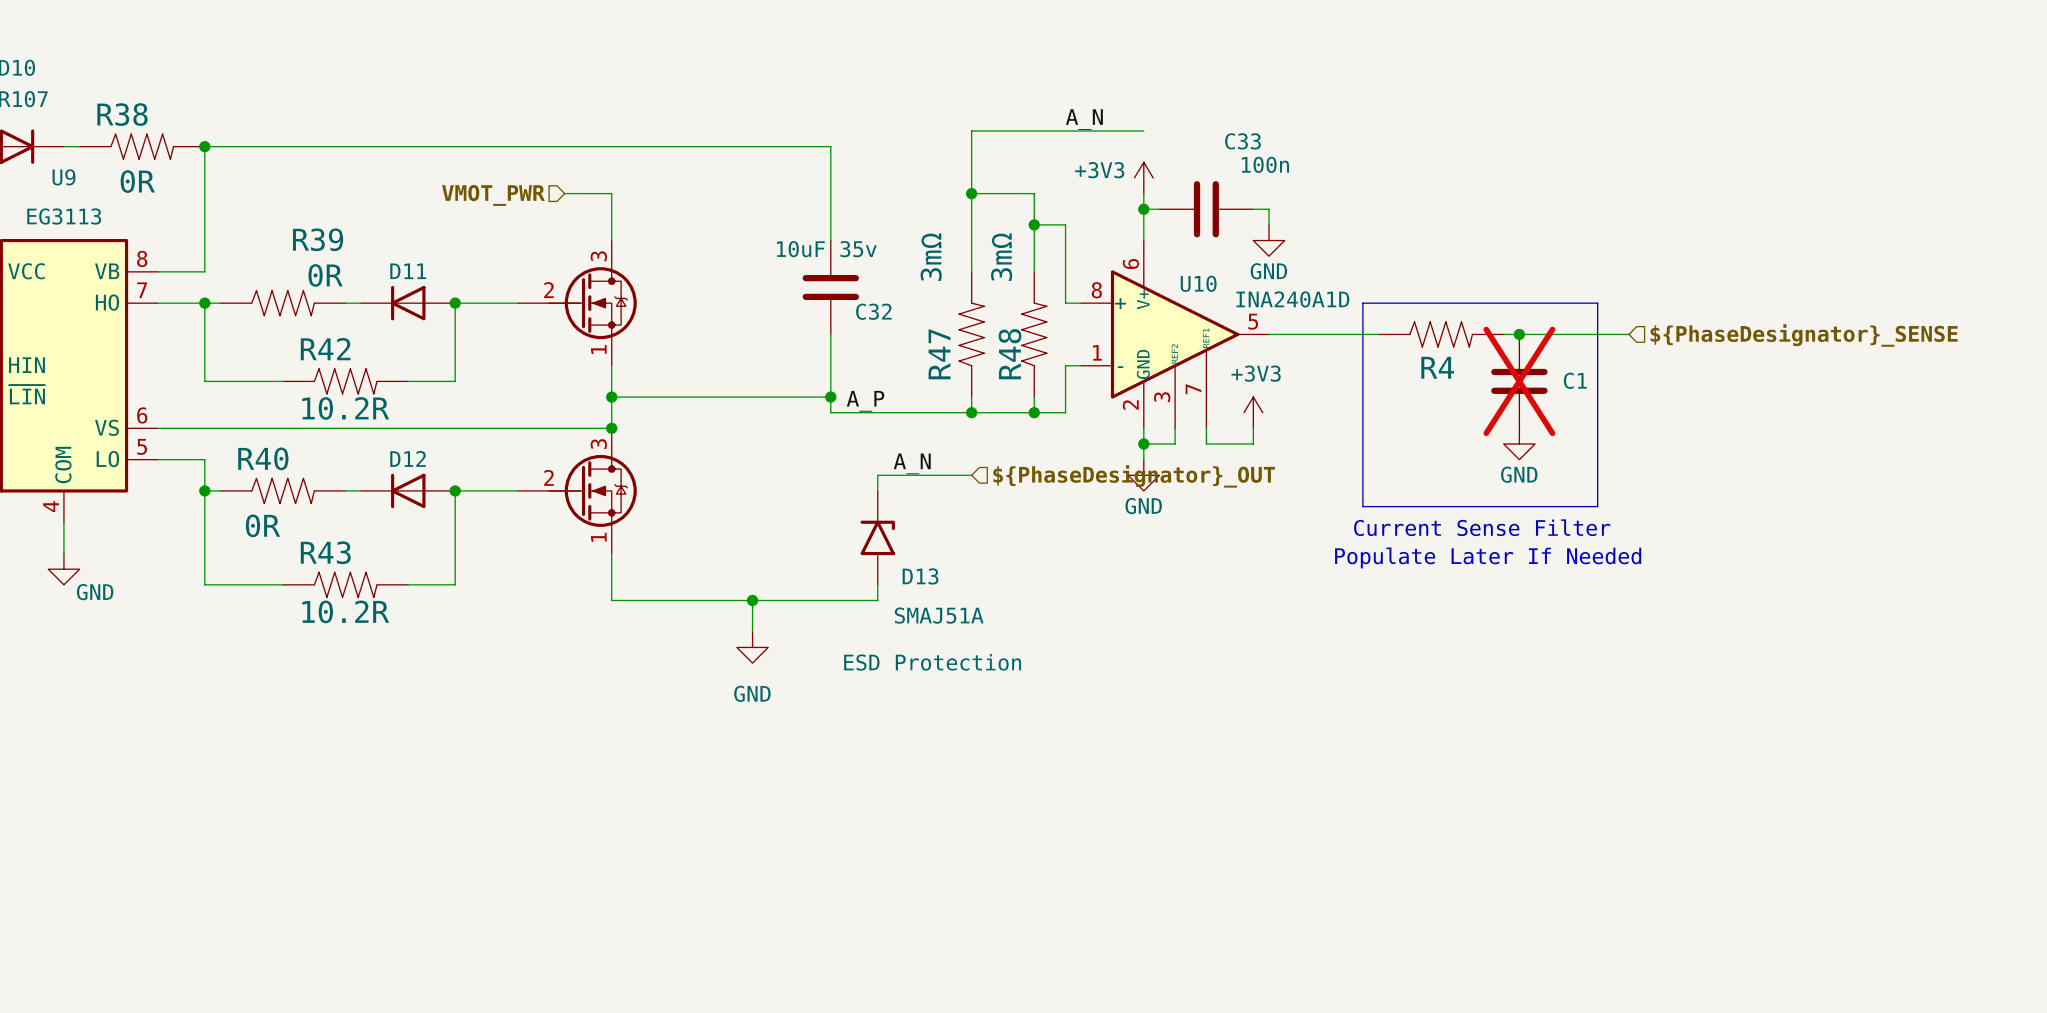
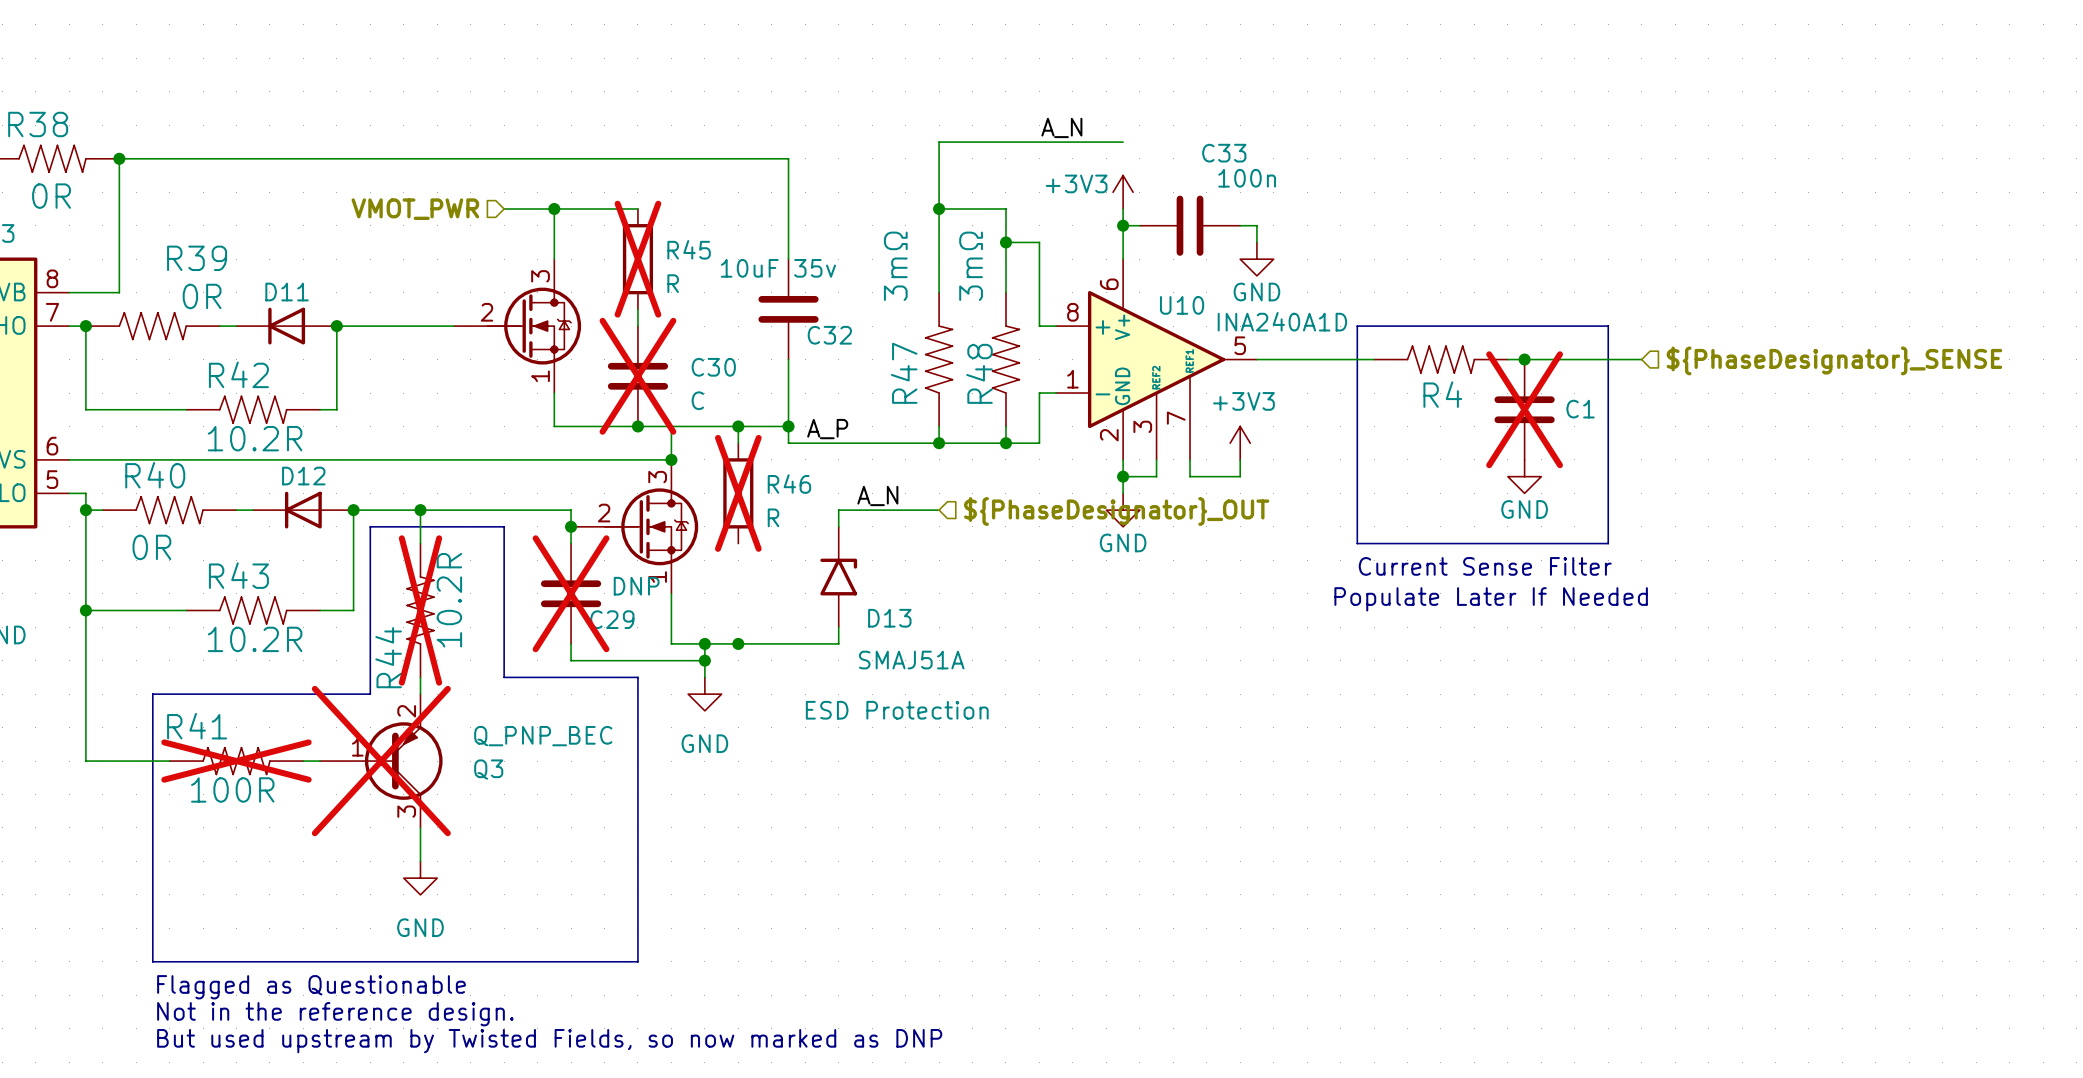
wire: none -> (554, 208) (637, 208)
junction: none -> (554, 208)
R45: none -> R (637, 259)
wire: none -> (637, 309) (637, 326)
wire: (204, 303) (204, 381) -> (85, 326) (85, 409) (119, 409)
junction position: (204, 303) -> (85, 326)
R39 position: (283, 303) -> (152, 326)
D11 position: (408, 303) -> (286, 326)
wire: (455, 303) (455, 381) (408, 381) -> (387, 326) (336, 326) (336, 409) (320, 409)
junction position: (455, 303) -> (336, 326)
C30: none -> C (637, 376)
R42 position: (345, 381) -> (253, 409)
wire: (611, 397) (611, 428) -> (671, 426) (671, 459) (554, 459)
junction: (611, 397) -> none
junction: none -> (637, 426)
wire: none -> (738, 426) (738, 443)
junction: none -> (738, 426)
junction: (611, 428) -> none
junction: none -> (671, 459)
wire: (173, 459) (204, 459) (204, 584) (283, 584) -> (85, 493) (85, 761) (169, 761)
R46: none -> R (738, 493)
junction: none -> (353, 510)
wire: none -> (420, 510) (420, 543)
junction: none -> (420, 510)
wire: (204, 490) (220, 490) -> (85, 510) (102, 510)
junction position: (204, 490) -> (85, 510)
R40 position: (283, 490) -> (169, 510)
wire: (345, 490) (361, 490) -> (236, 510) (253, 510)
D12 position: (408, 490) -> (303, 510)
line: none -> (370, 526) (370, 694) (152, 694) (152, 961) (637, 961) (637, 677) (504, 677) (504, 526) (370, 526)
junction: (455, 490) -> none
wire: (517, 490) (455, 490) (455, 584) (408, 584) -> none
part position: (577, 490) -> (634, 526)
junction: none -> (571, 526)
wire: none -> (571, 543) (571, 510) (353, 510) (353, 610) (320, 610)
wire: (611, 553) (611, 600) (721, 600) -> (671, 593) (671, 643)
C29: none -> DNP (571, 593)
wire: none -> (85, 610) (186, 610)
junction: none -> (85, 610)
R44: none -> 10.2R (420, 610)
R43 position: (345, 584) -> (253, 610)
wire: none -> (571, 643) (571, 660) (704, 660)
junction: none -> (738, 643)
junction: none -> (704, 660)
wire: none -> (420, 677) (420, 694)
R41: none -> 100R (236, 761)
wire: none -> (303, 761) (320, 761)
Q3: none -> Q_PNP_BEC (381, 761)
wire: none -> (420, 827) (420, 861)
power symbol: none -> GND (420, 878)
text: none -> Flagged as Questionable (311, 987)
text: none -> Not in the reference design. (335, 1014)
text: none -> But used upstream by Twisted Fields, so now marked as DNP (549, 1041)

